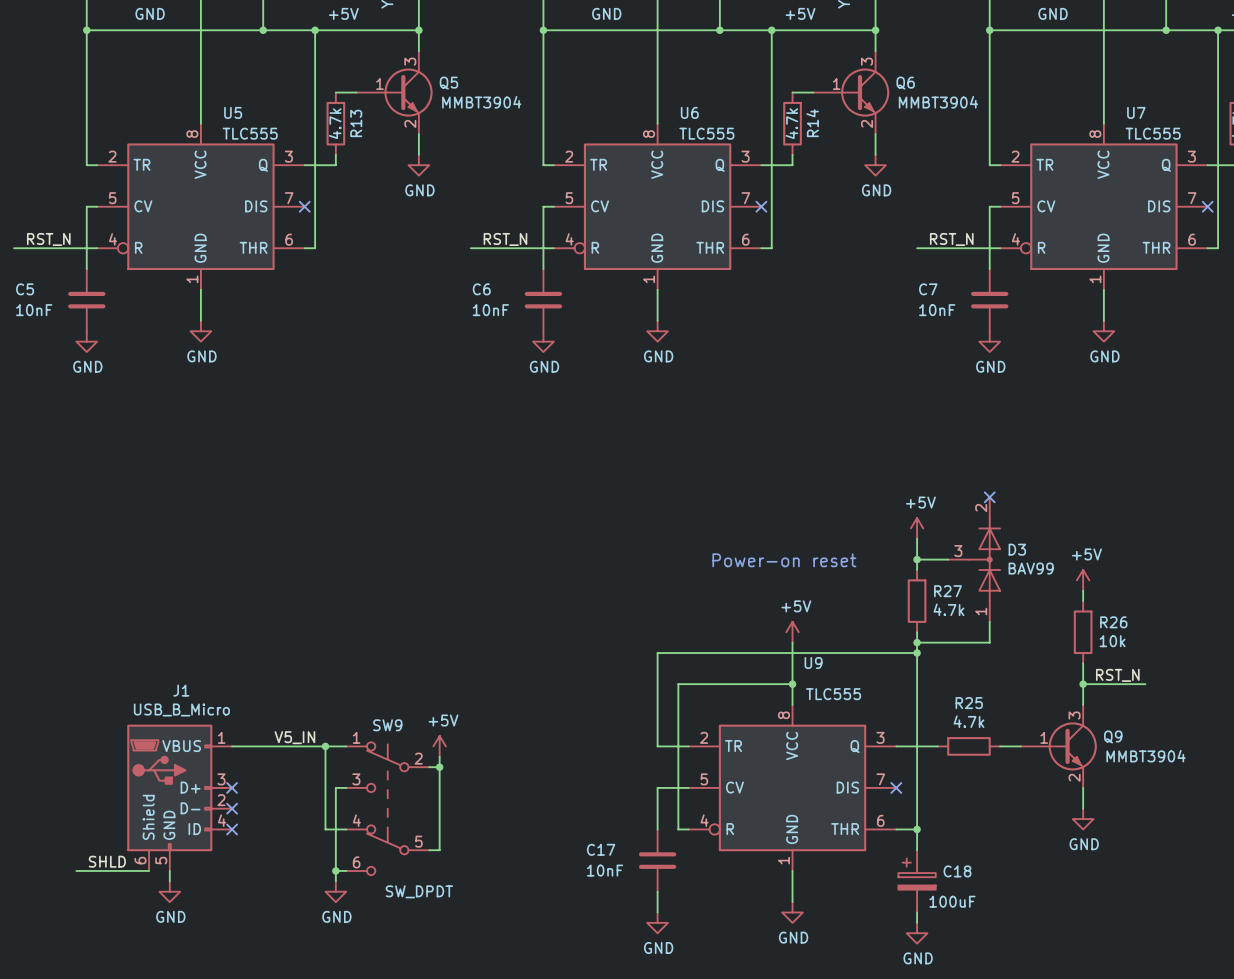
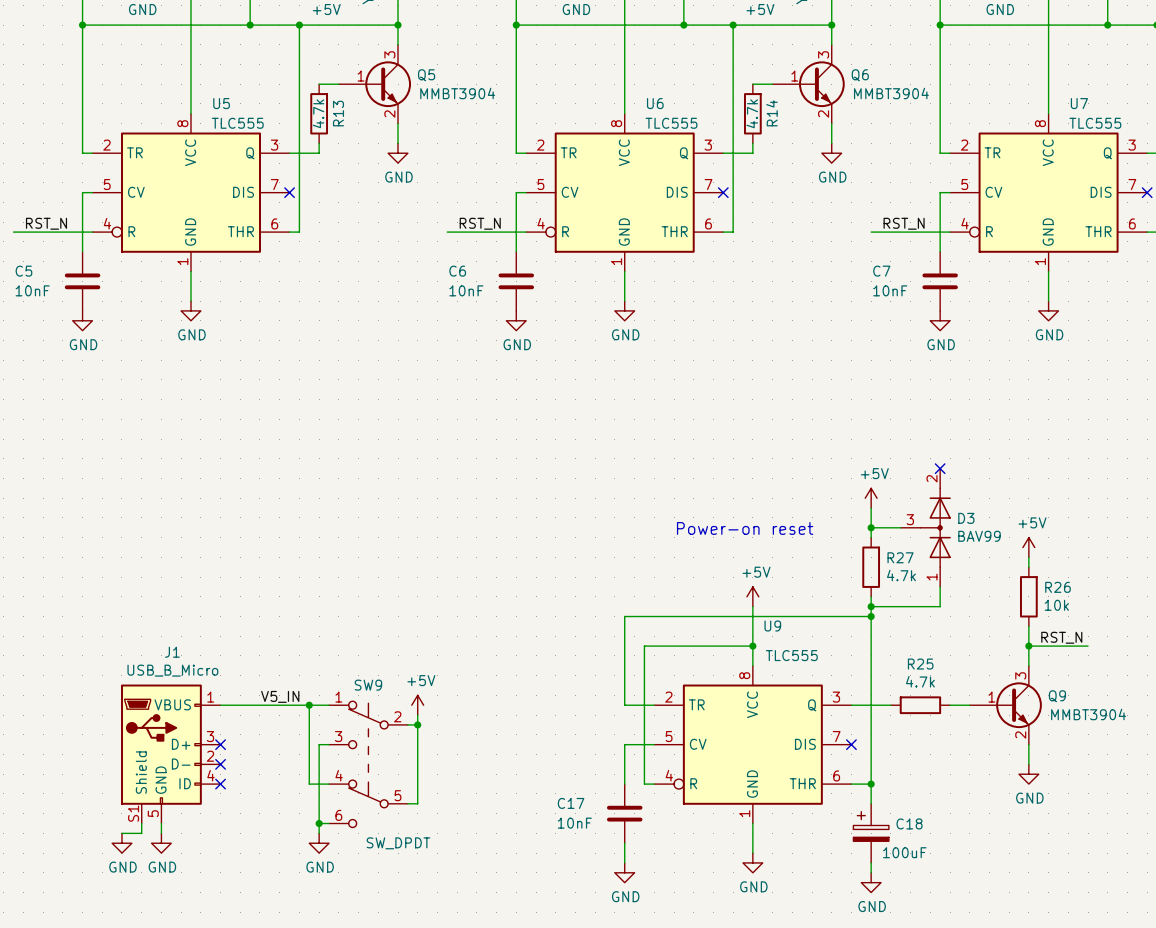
J1 pin number: 6 (140, 860) -> S1 (133, 813)
label: SHLD (107, 861) -> none
wire: (76, 870) (149, 870) -> (121, 833) (141, 833) (141, 823)
power symbol: none -> GND (121, 843)

